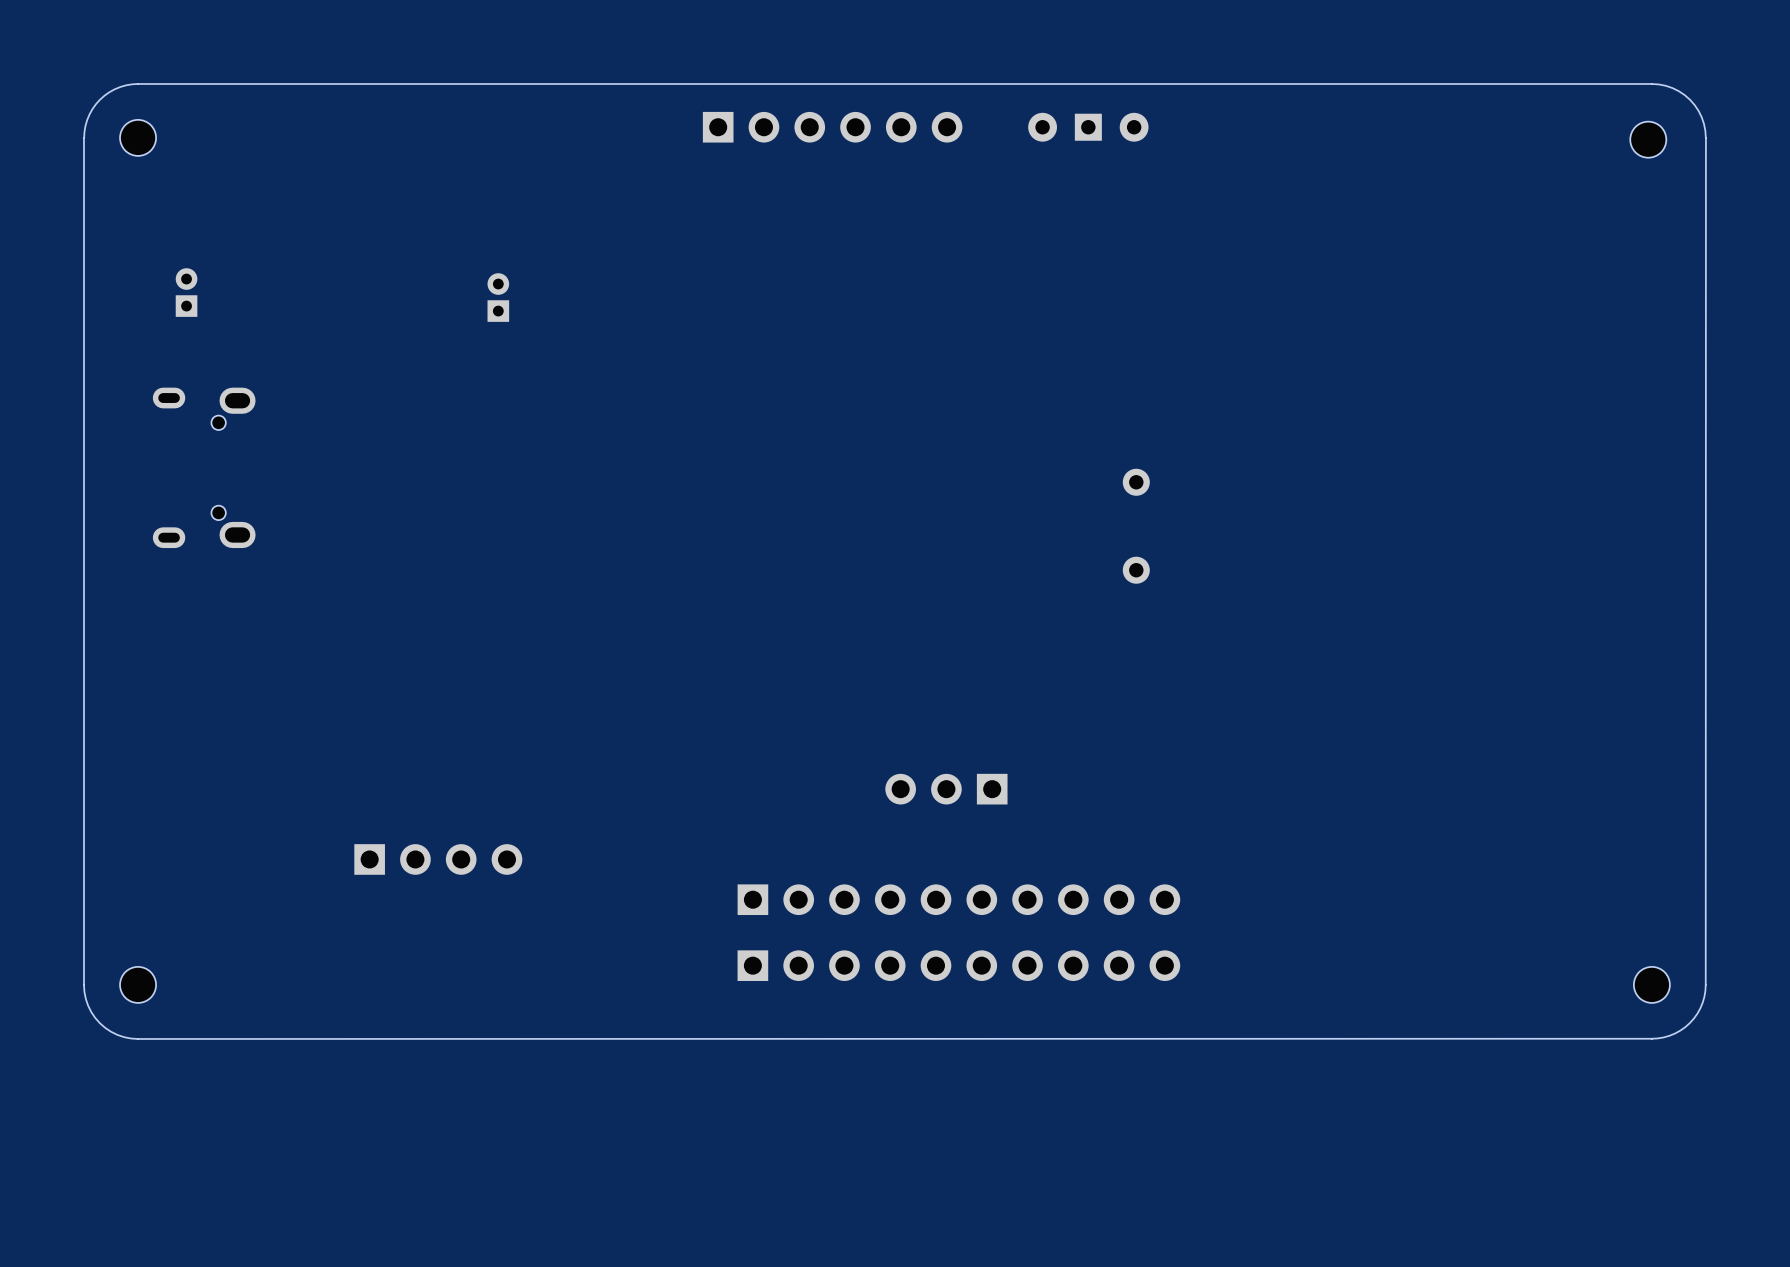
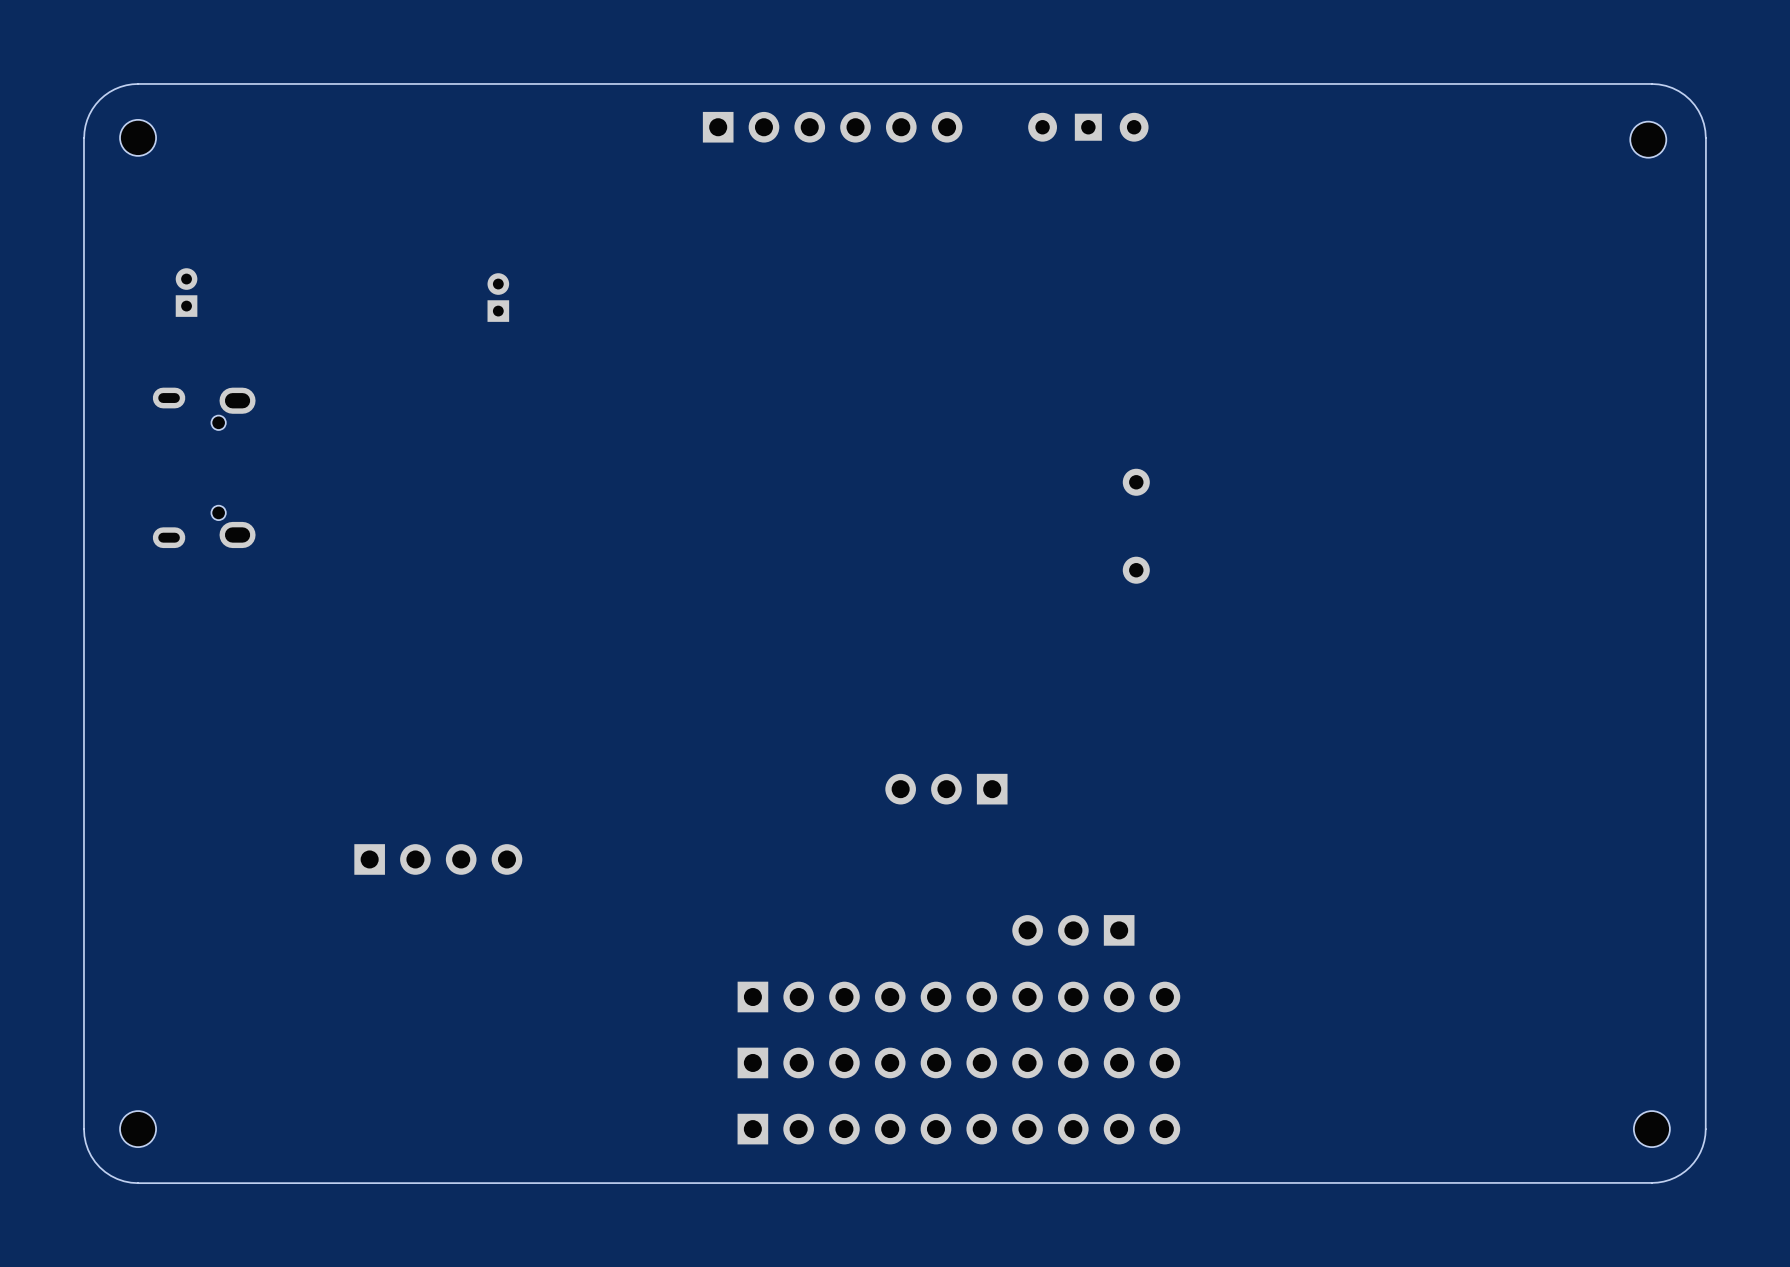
part: (958, 899) -> none
part: none -> (1073, 930)
part position: (958, 965) -> (958, 997)
part position: (138, 984) -> (138, 1129)
part position: (1651, 984) -> (1651, 1129)
board edge: (1705, 984) (1700, 1008) (1689, 1022) (1669, 1035) (1651, 1038) (138, 1038) (117, 1034) (99, 1023) (88, 1005) (83, 984) -> (1705, 984) (1704, 1141) (1697, 1157) (1685, 1171) (1669, 1179) (1657, 1182) (138, 1183) (117, 1179) (105, 1171) (91, 1156) (85, 1143) (83, 1129) (83, 984)
part: none -> (958, 1062)
part: none -> (958, 1129)

